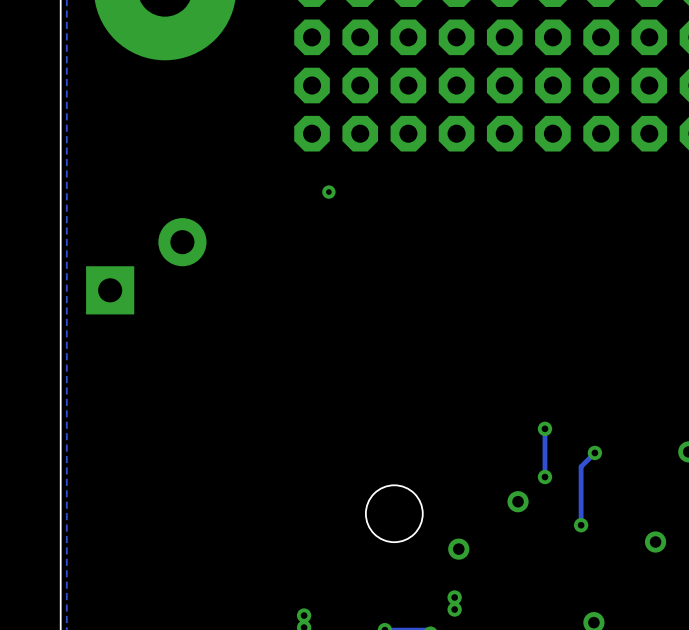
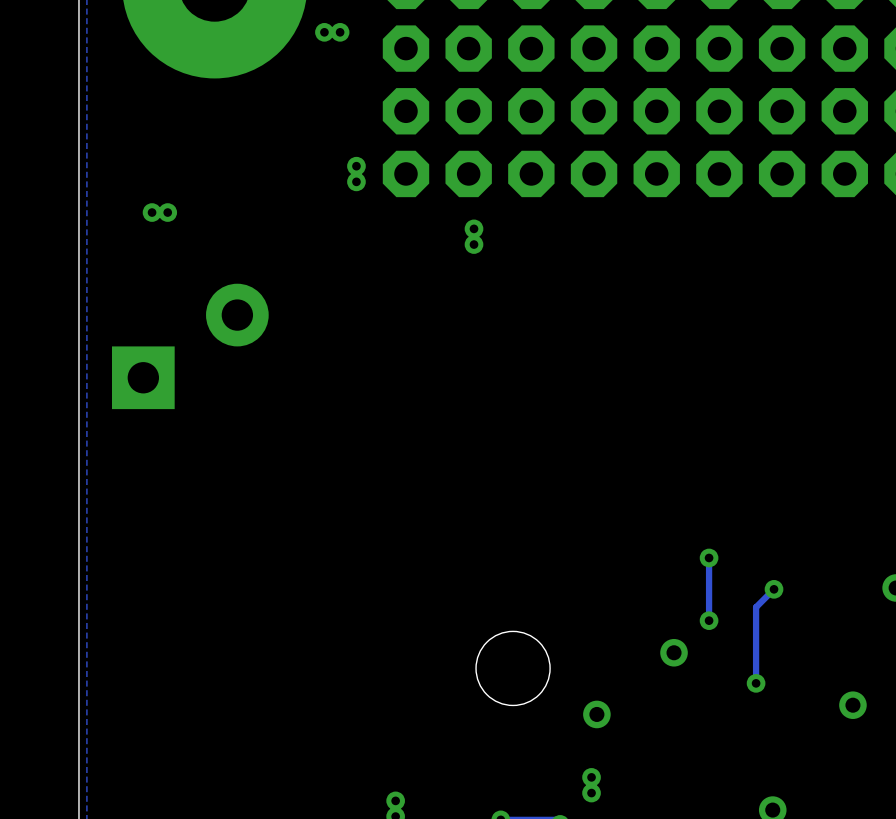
via: none -> (324, 32)
via: none -> (340, 32)
via: none -> (356, 166)
via: none -> (356, 181)
via: none -> (152, 212)
via: none -> (167, 212)
via: none -> (474, 228)
via: none -> (474, 244)
via: (328, 192) -> none

